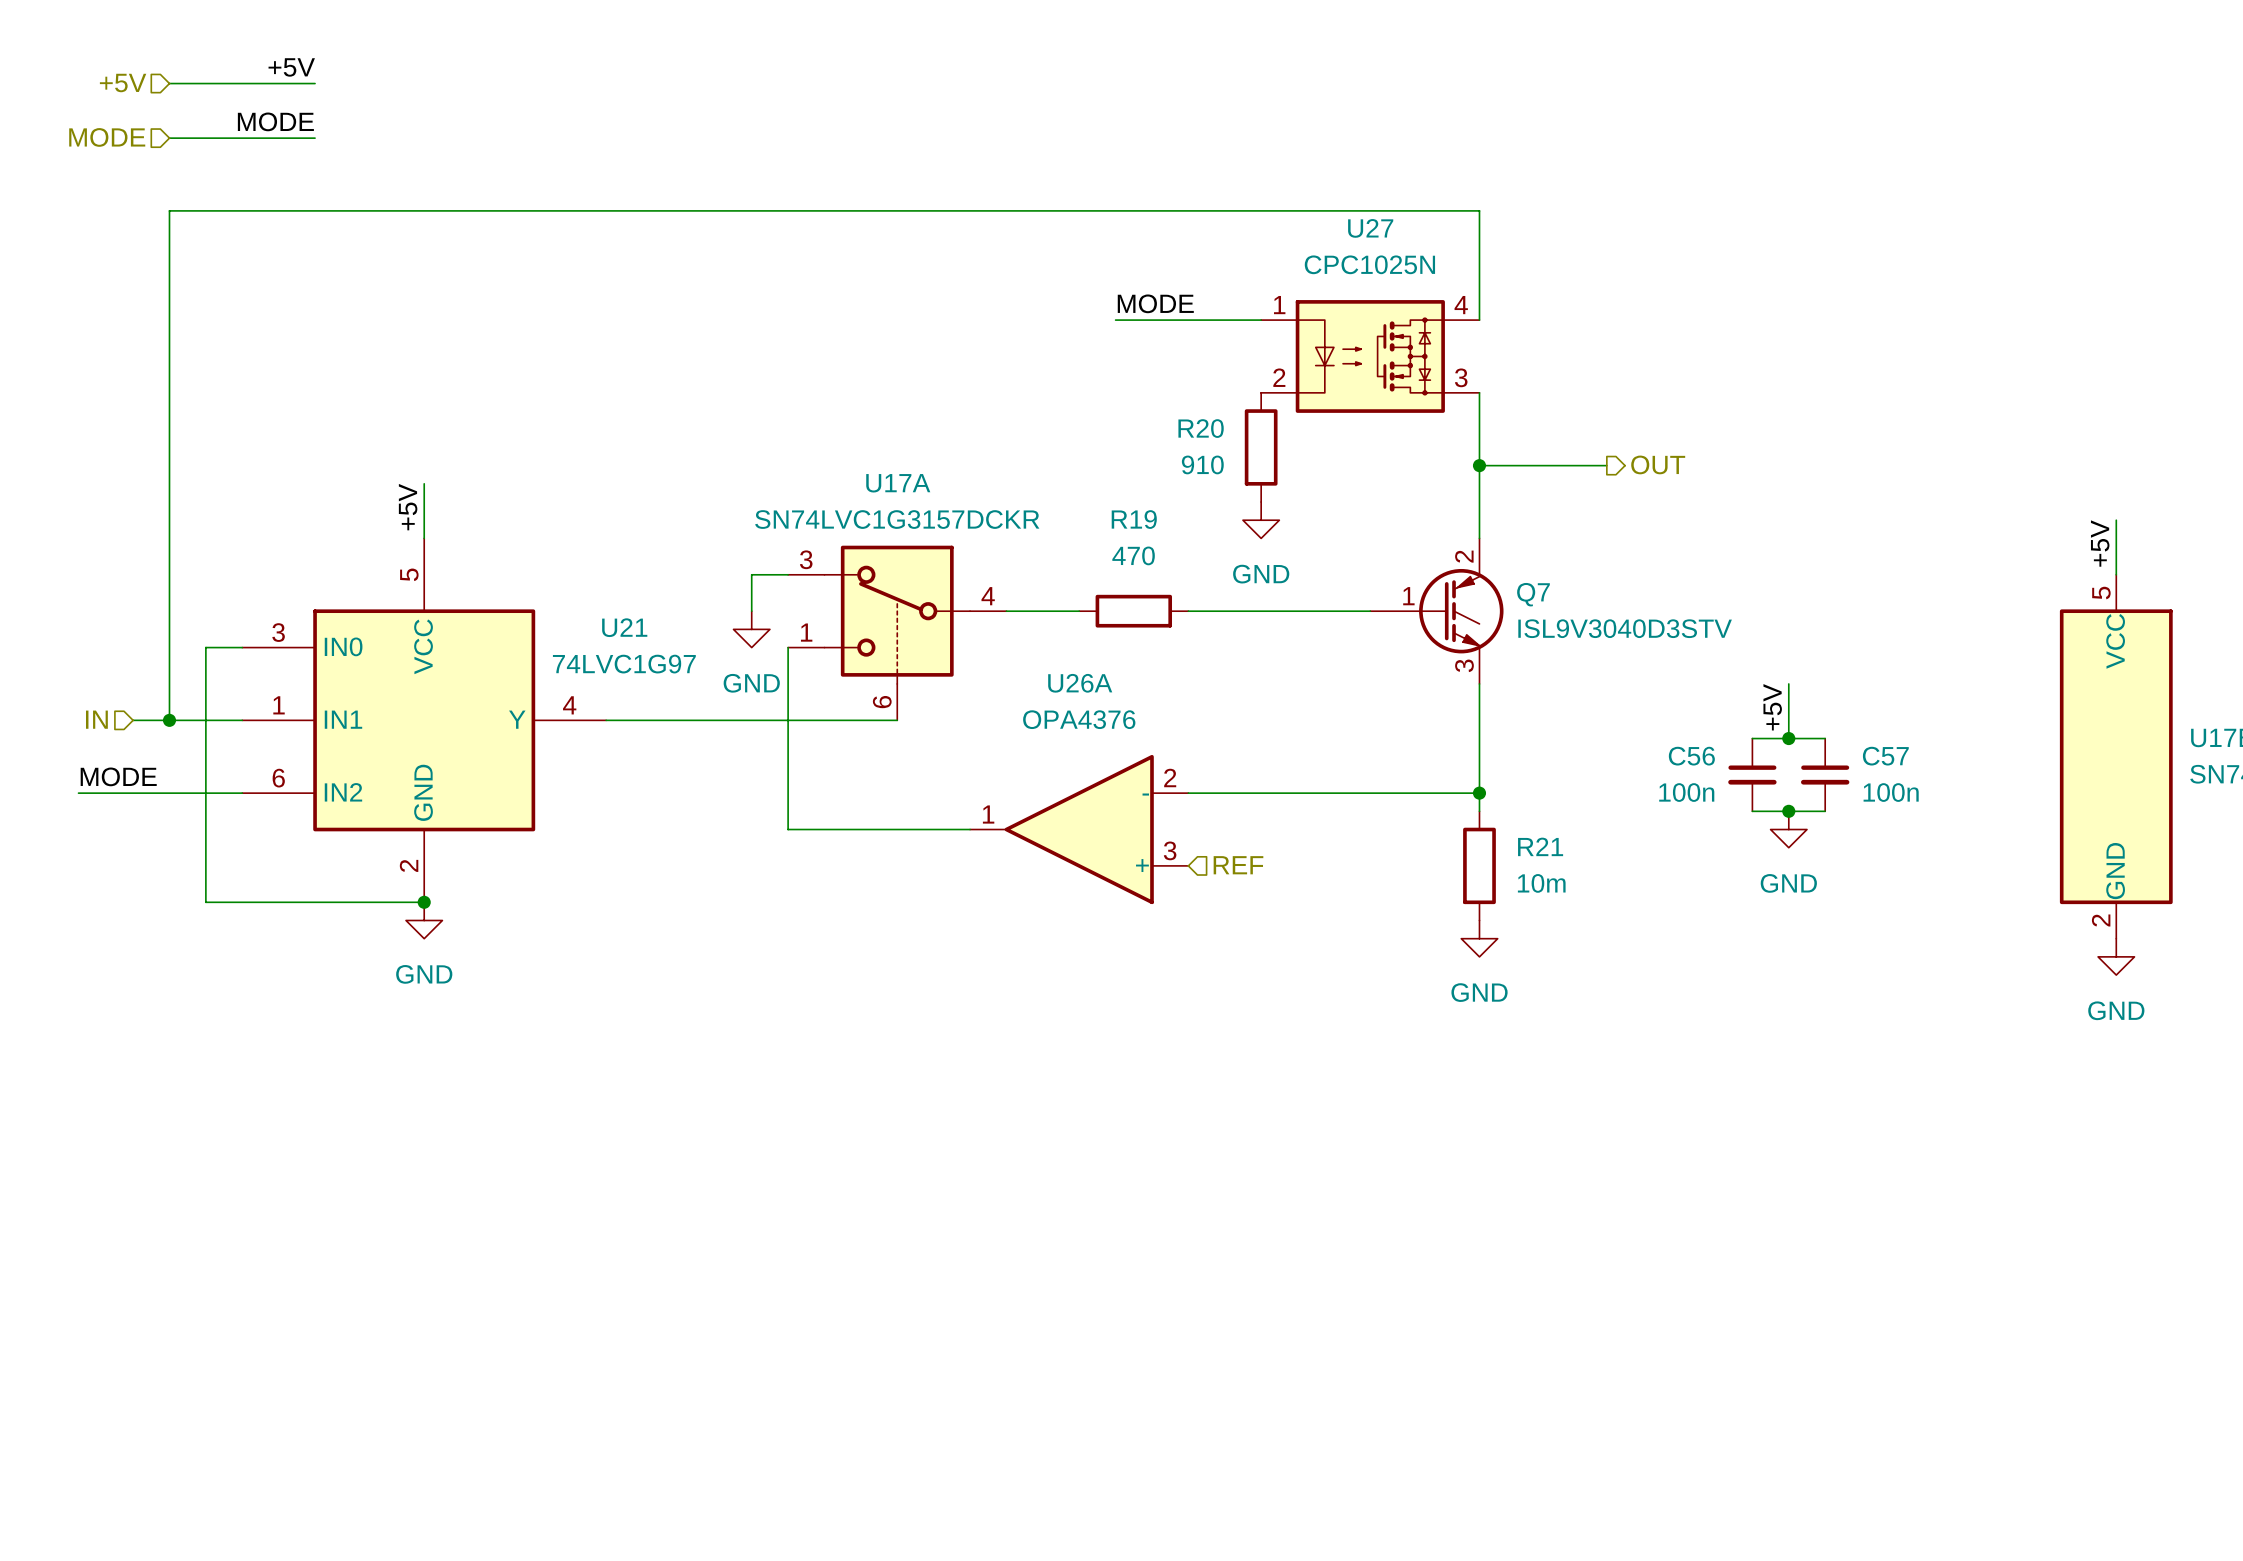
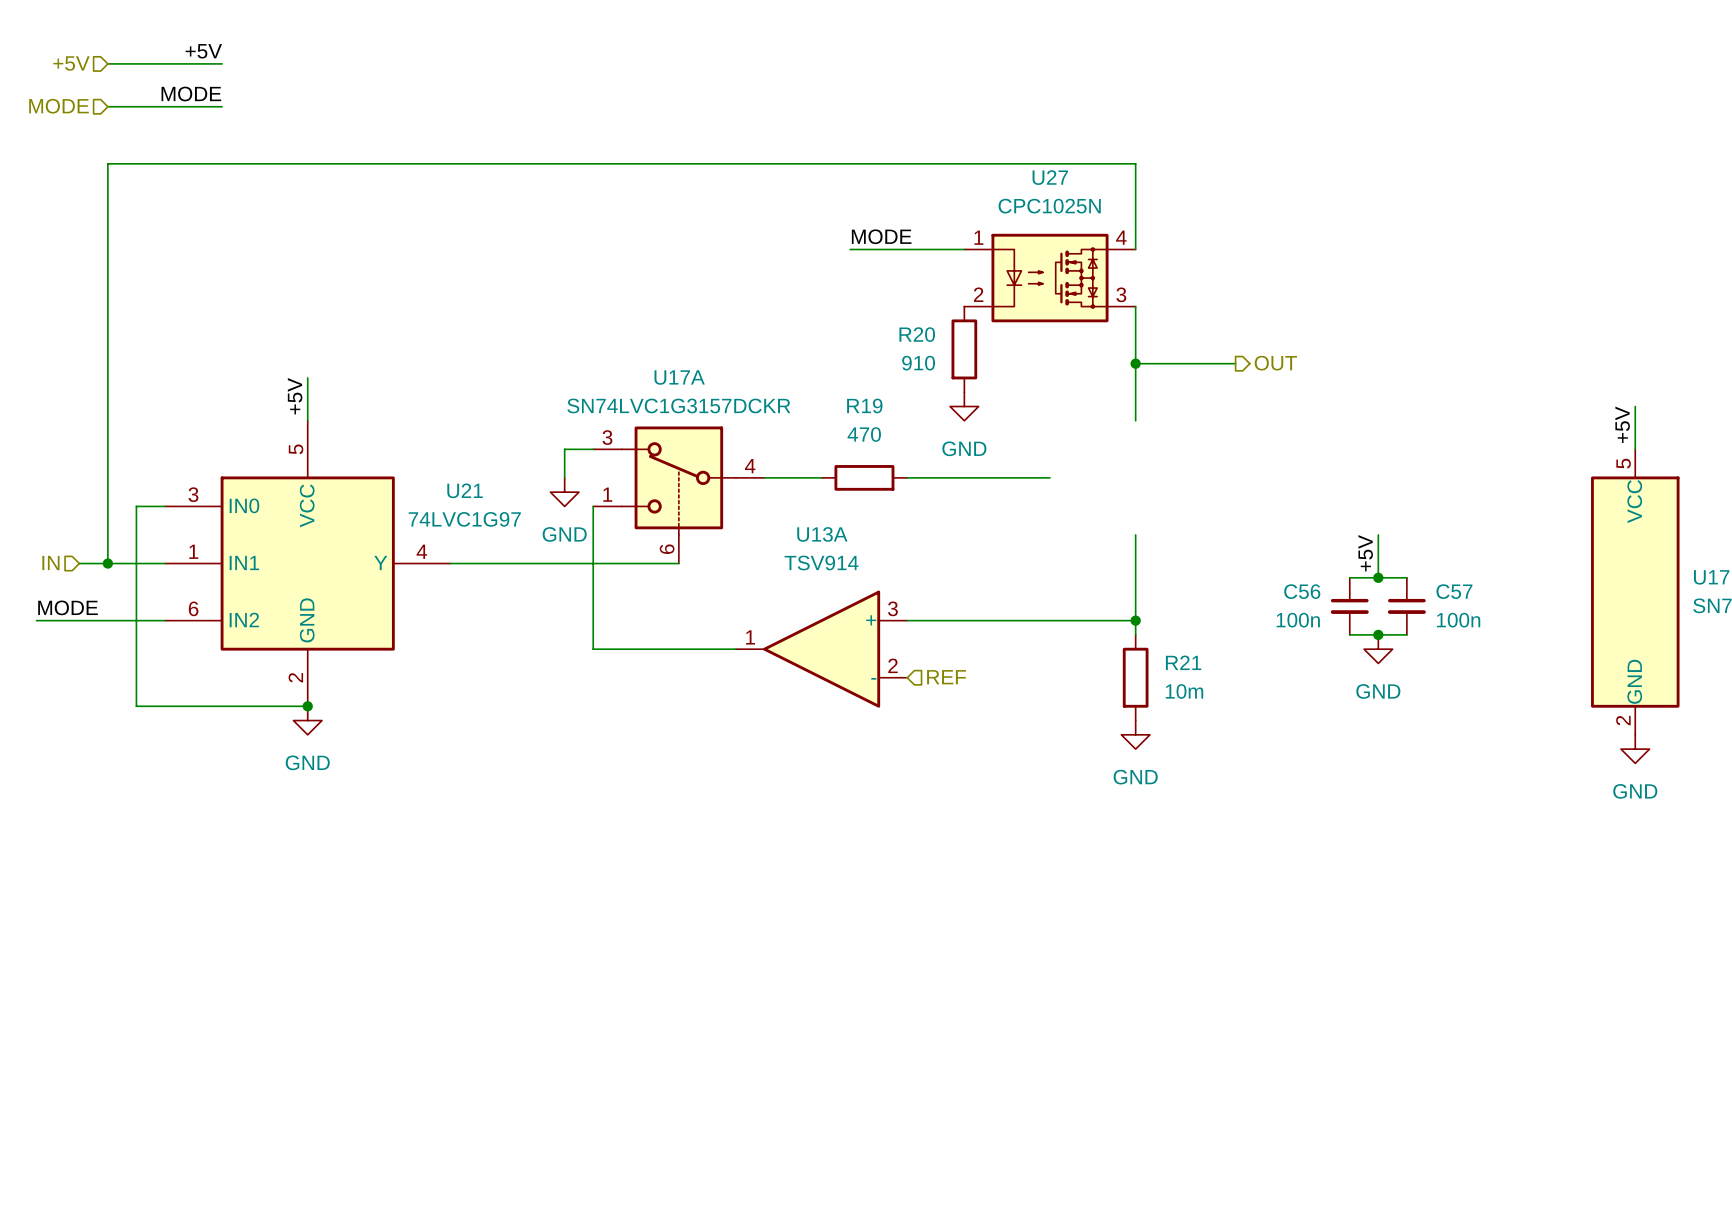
Q7: ISL9V3040D3STV (1436, 611) -> none
U26A name: U26A (1080, 683) -> U13A (822, 534)
U26A value: OPA4376 (1079, 719) -> TSV914 (821, 563)
U26A flip: as is (1079, 829) -> up-down (821, 649)

